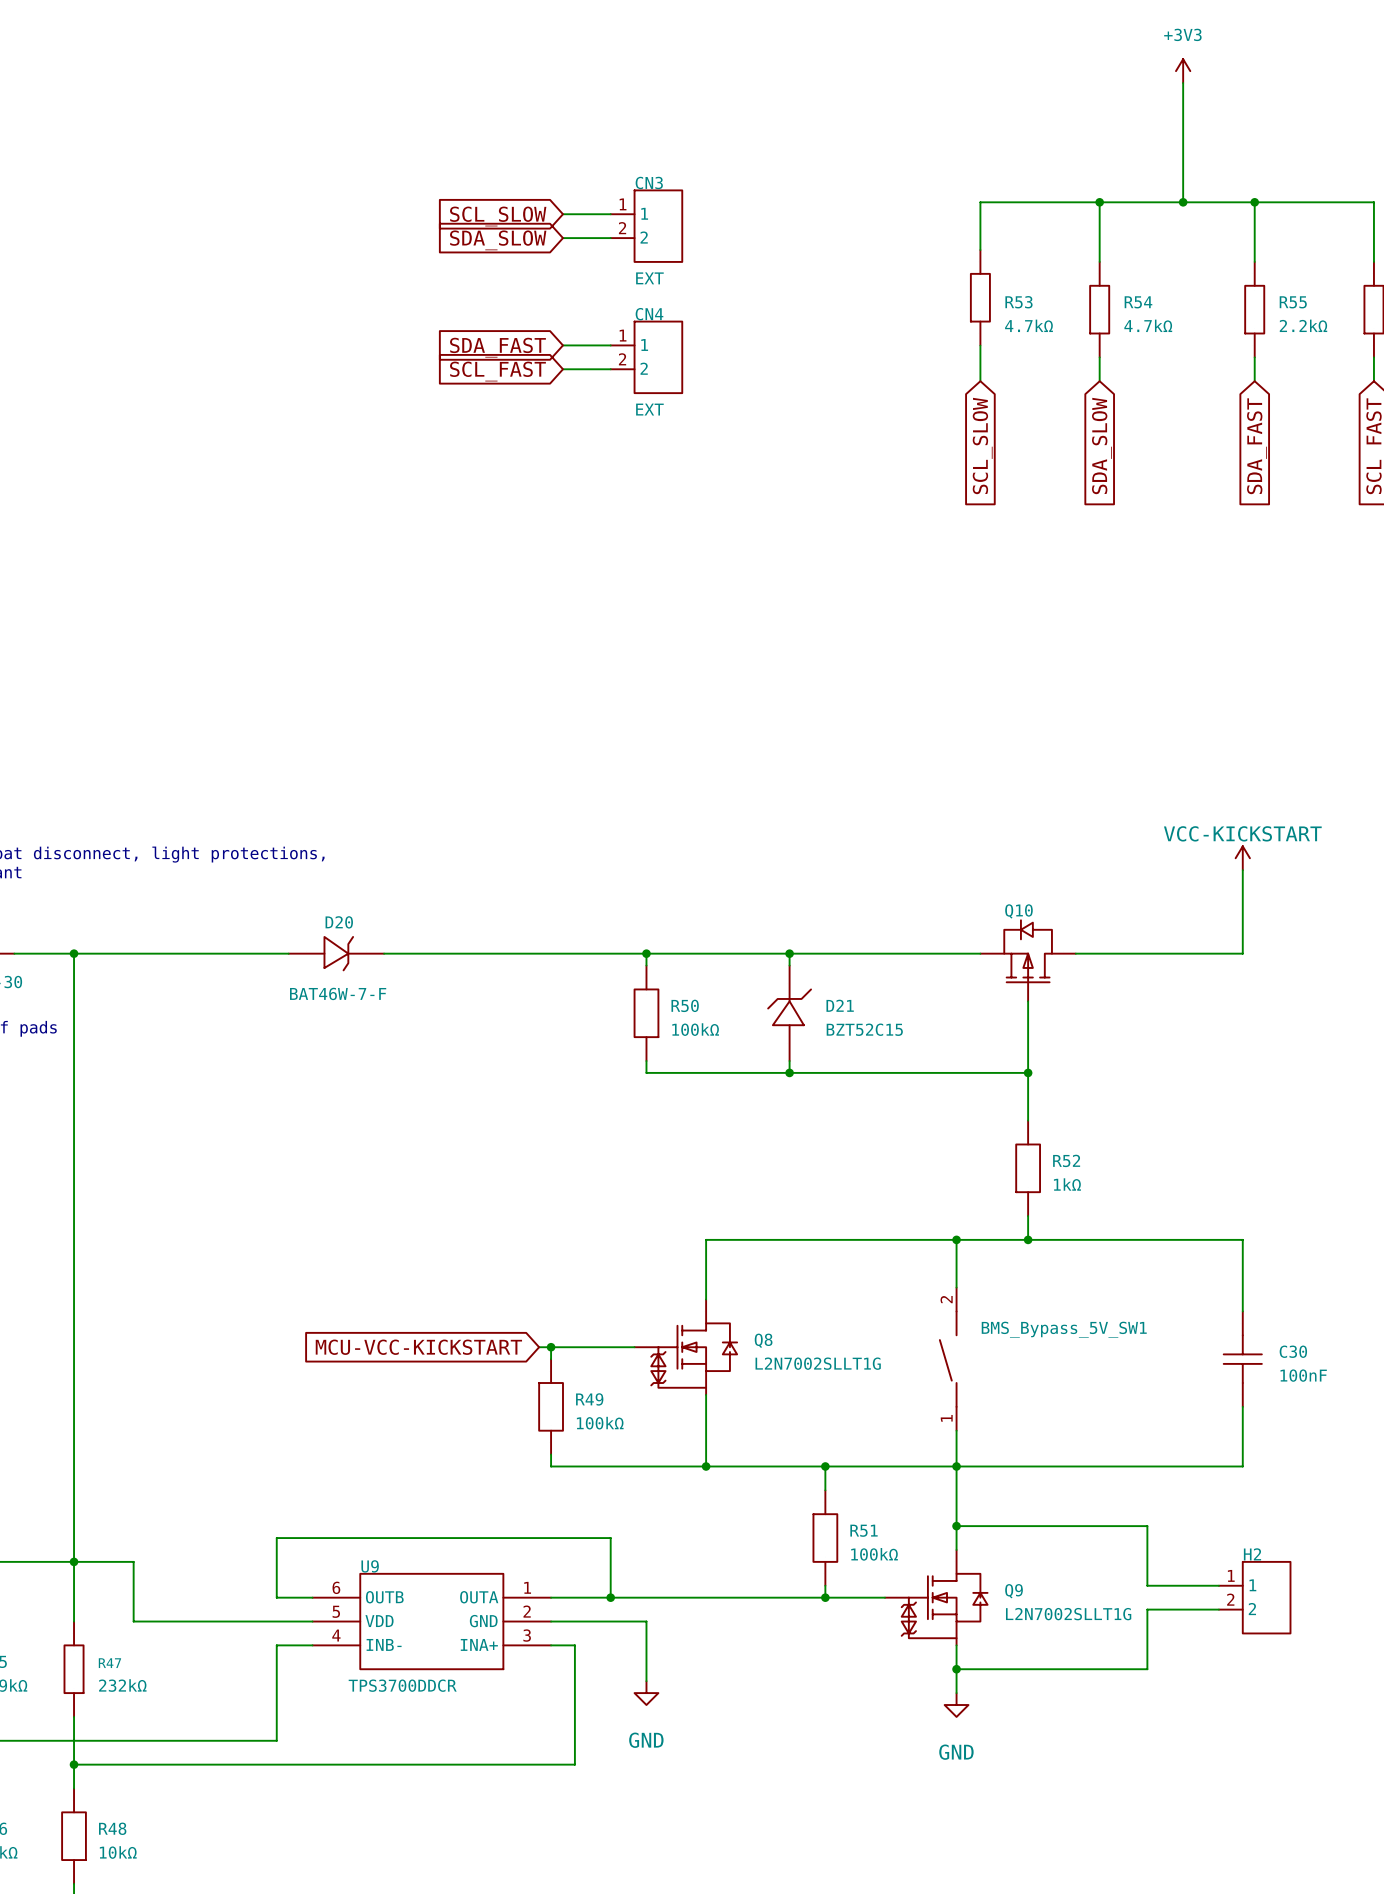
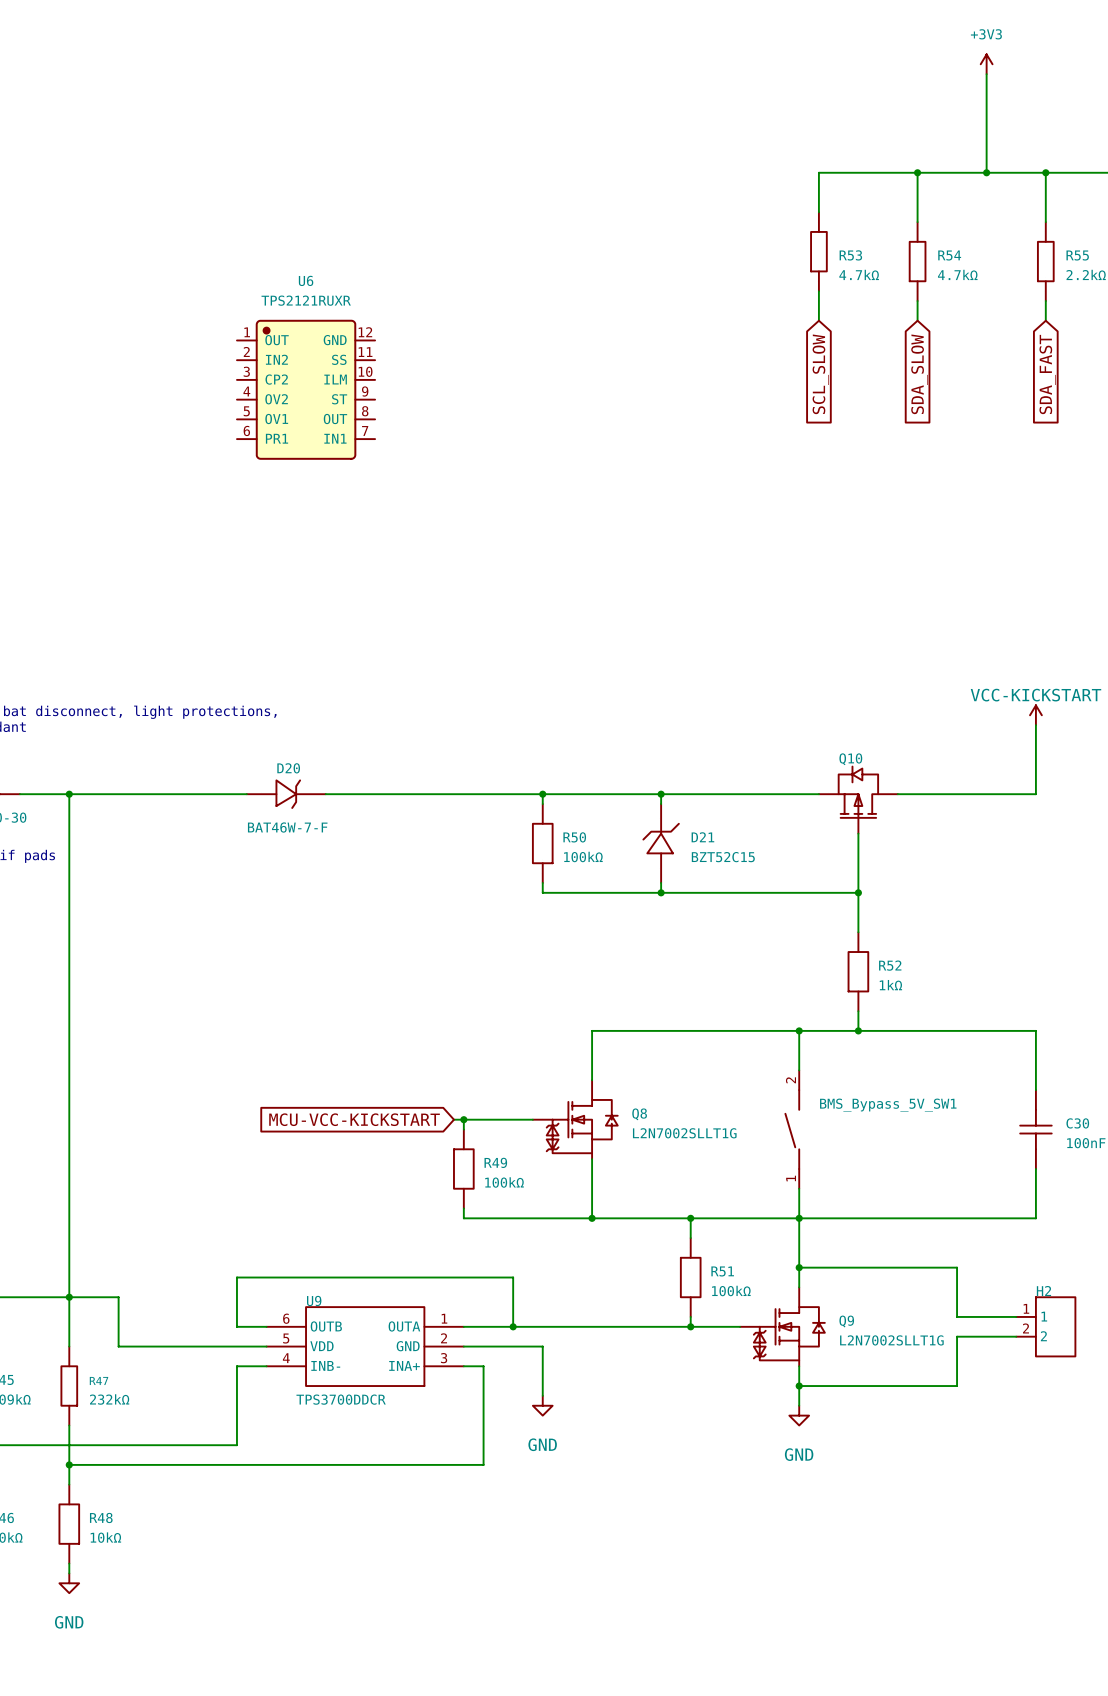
wire: (562, 214) (610, 214) -> none
global label: SCL_SLOW (498, 216) -> none
CN3: EXT (646, 226) -> none
wire: (562, 238) (610, 238) -> none
global label: SDA_SLOW (498, 240) -> none
wire: (562, 345) (610, 345) -> none
global label: SDA_FAST (497, 347) -> none
CN4: EXT (646, 357) -> none
wire: (562, 369) (610, 369) -> none
global label: SCL_FAST (497, 371) -> none
U6: none -> TPS2121RUXR (306, 389)

